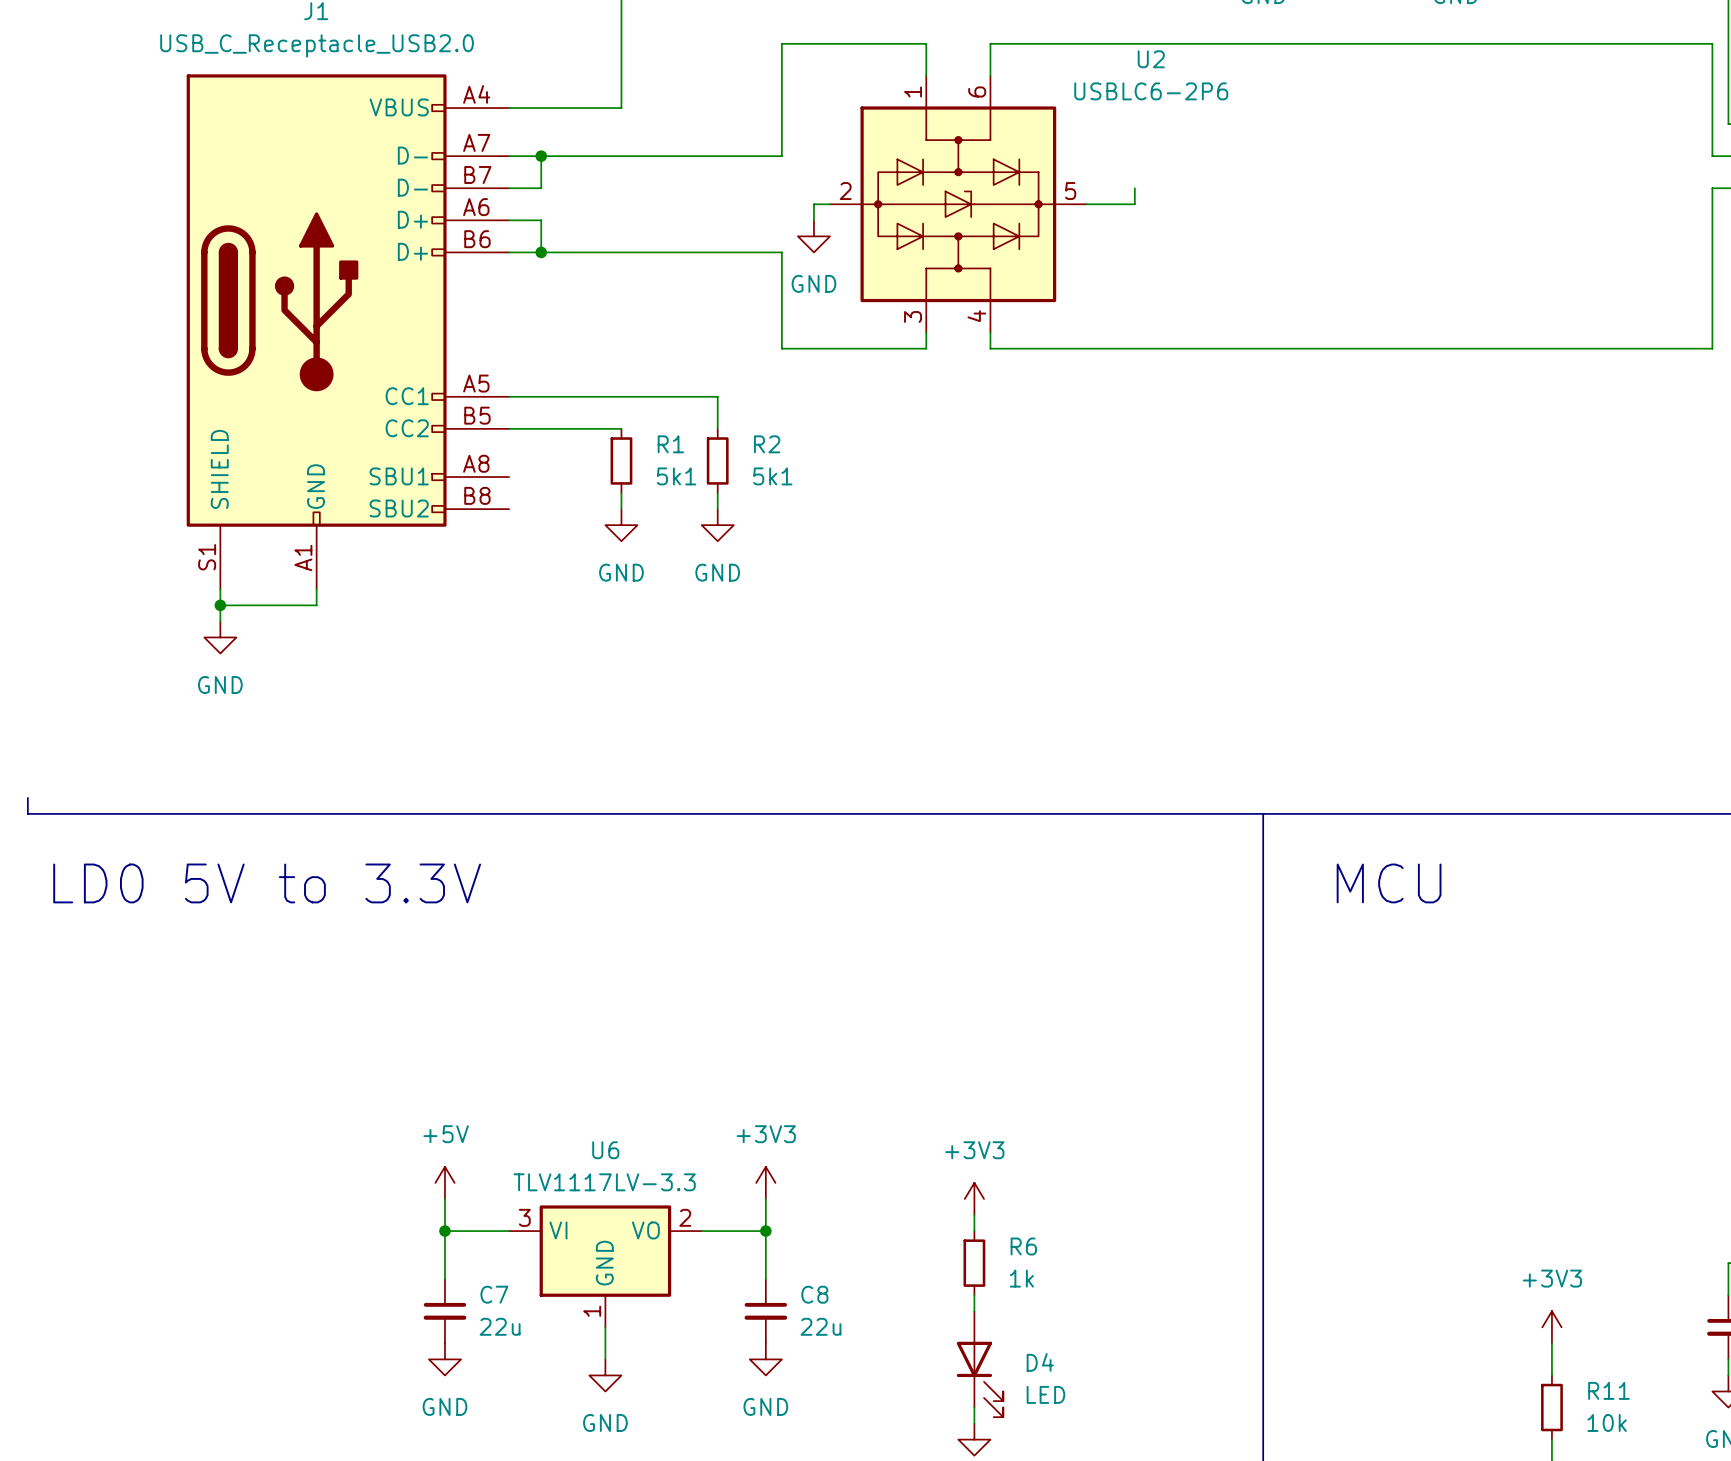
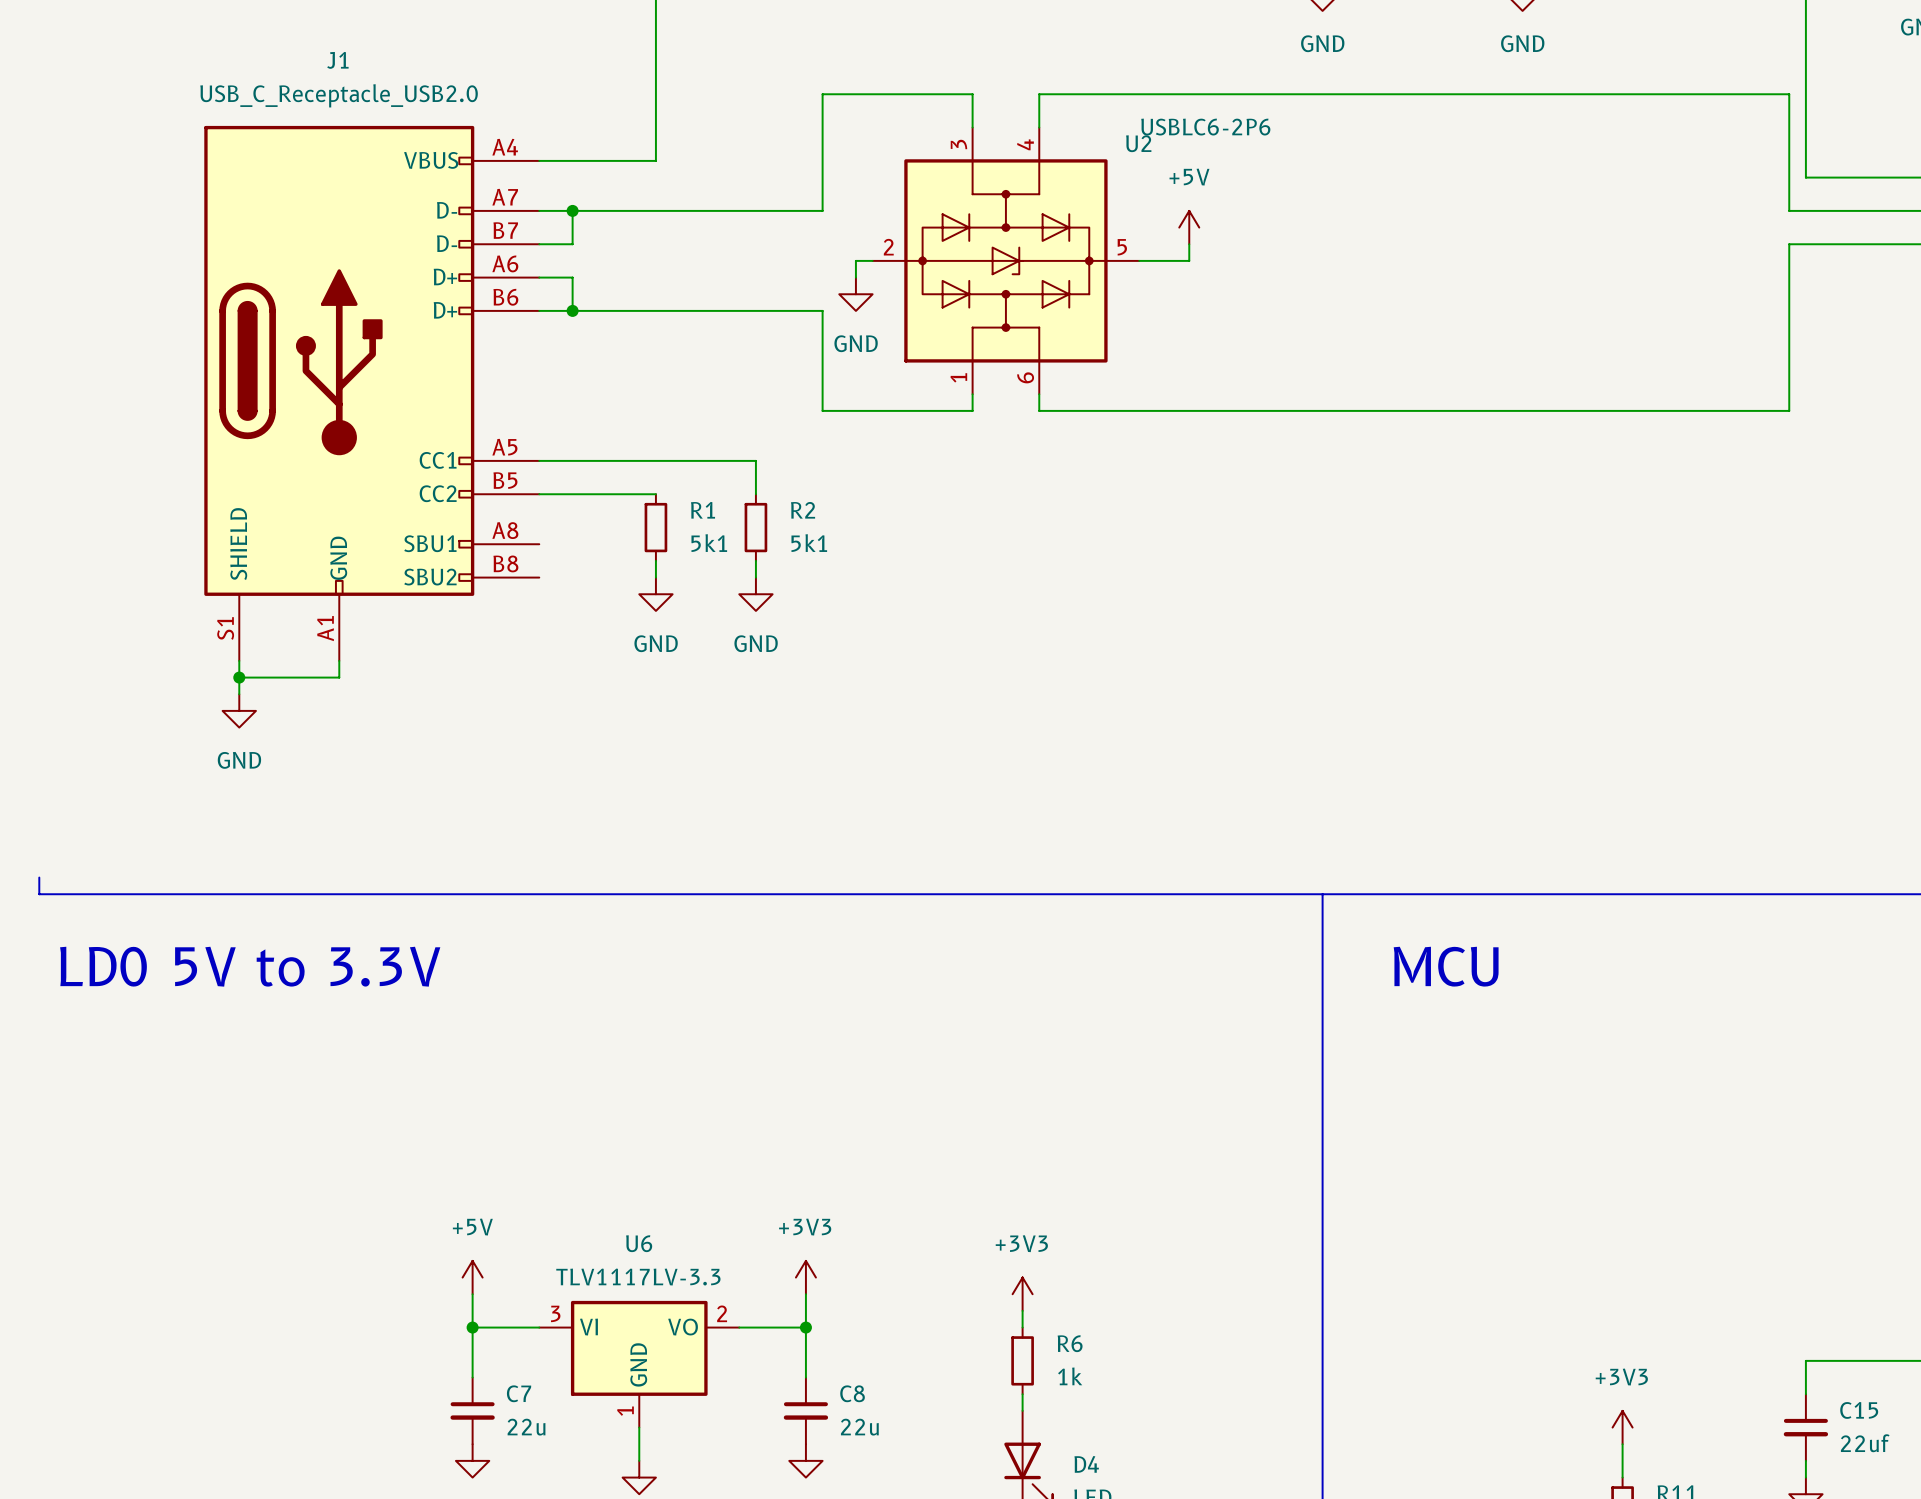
U2 name position: U2 (1151, 59) -> U2 (1138, 143)
power symbol: none -> +5V (1189, 227)
U2 flip: as is (958, 204) -> up-down (1005, 260)

